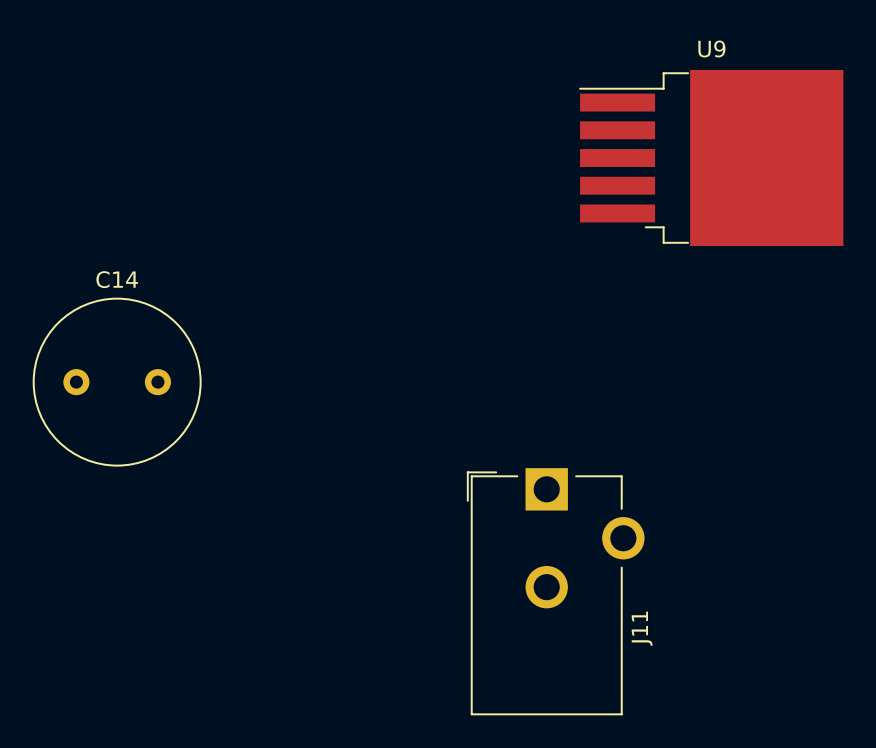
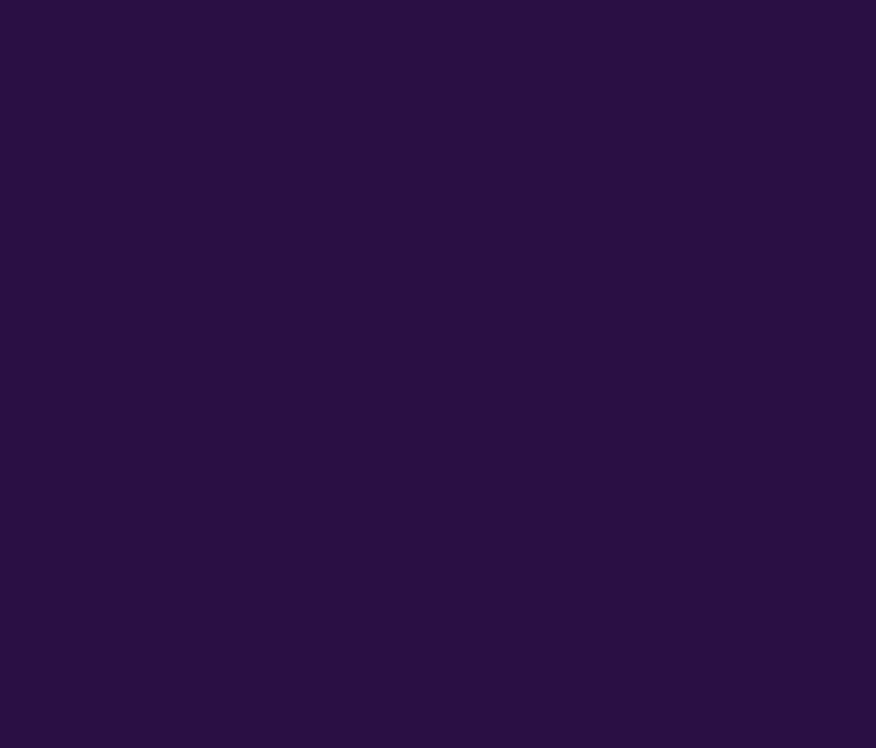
U9: (711, 158) -> none
C14: (117, 382) -> none
J11: (555, 591) -> none

